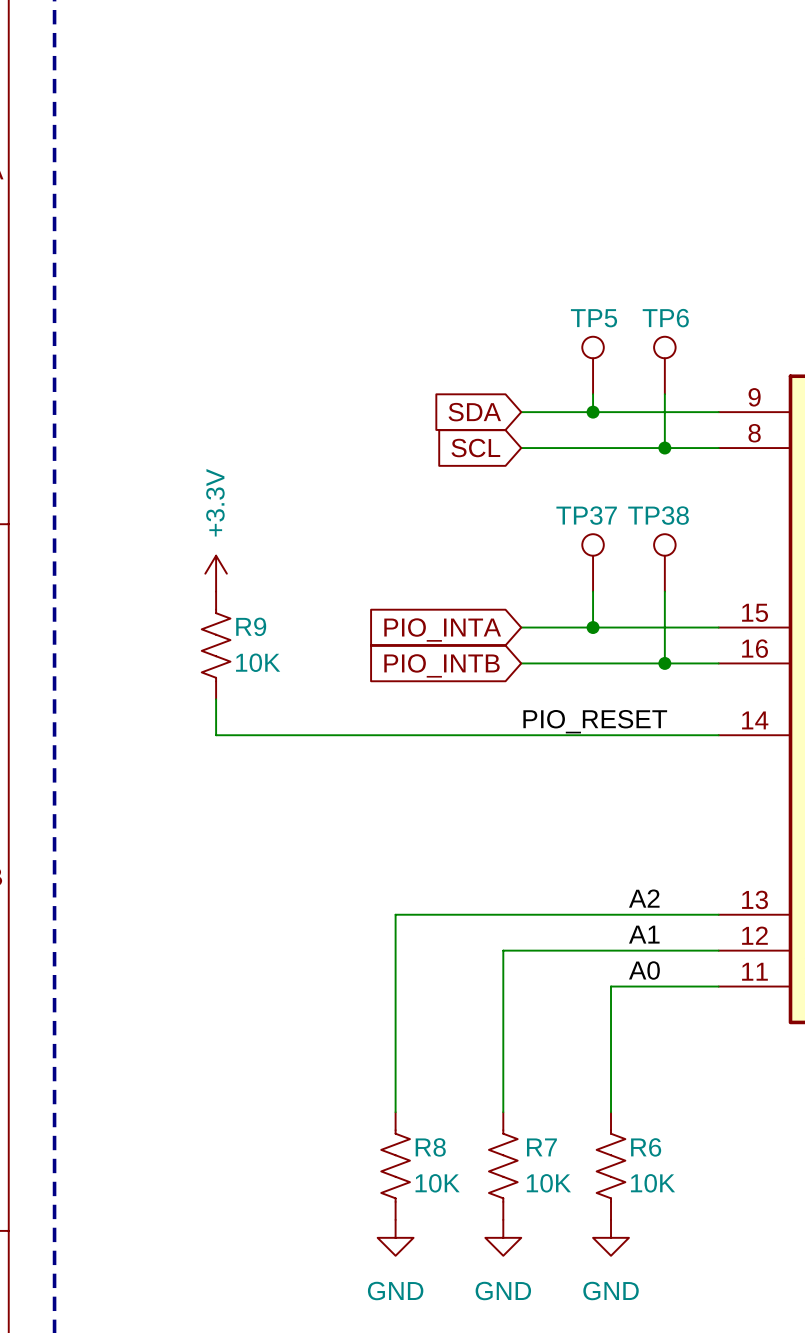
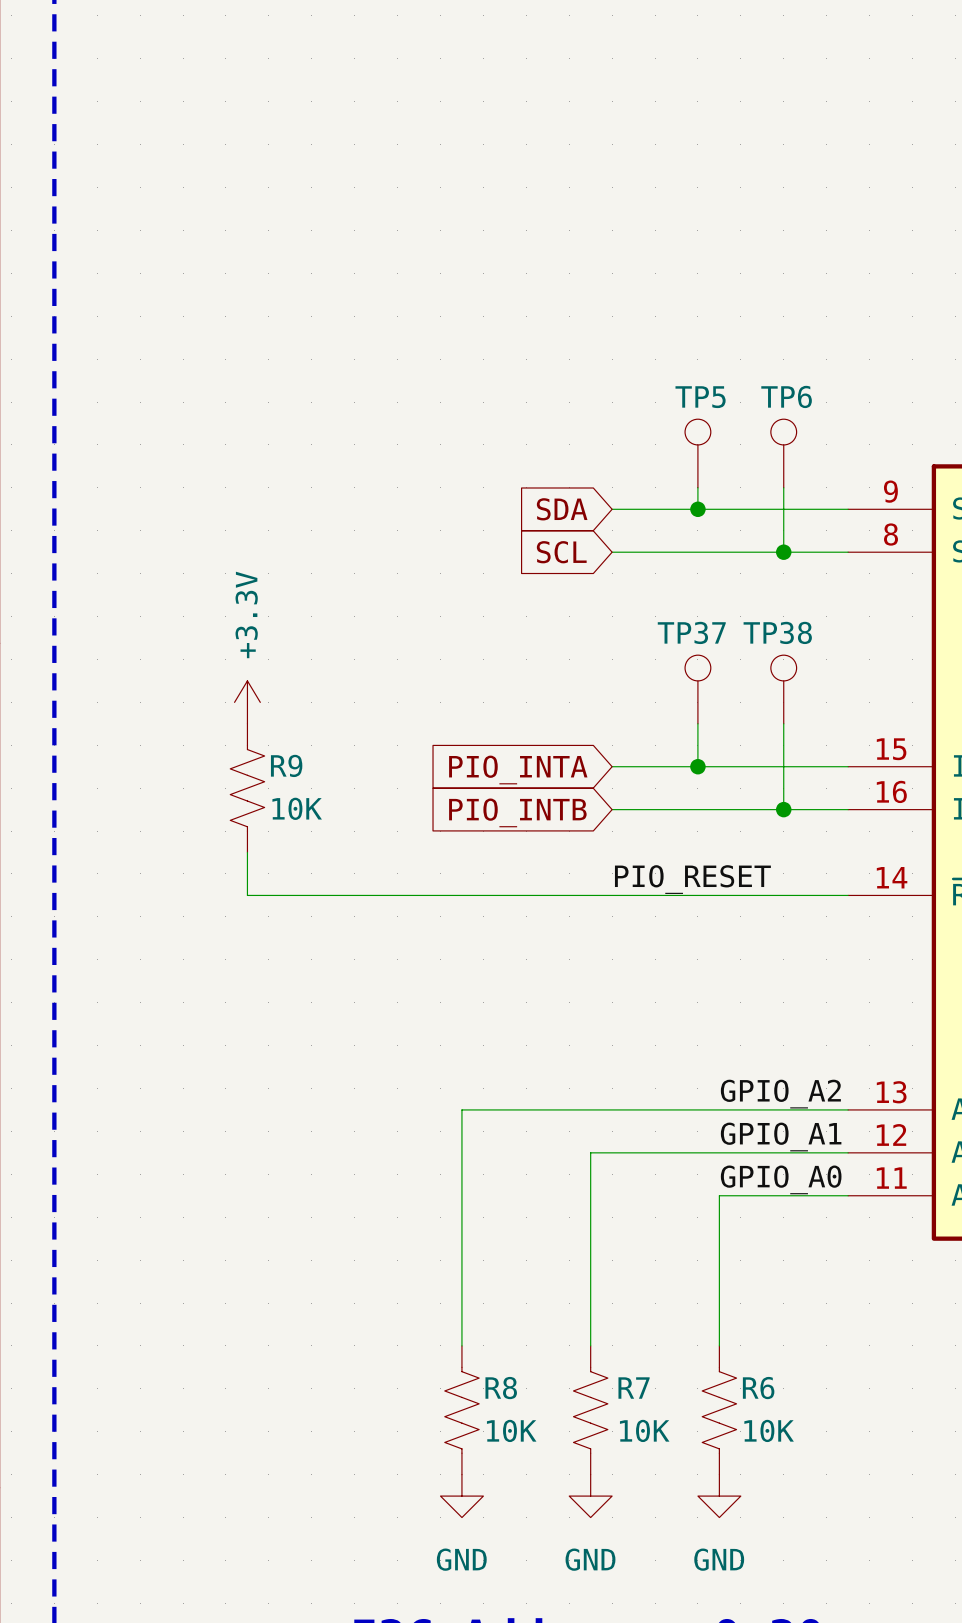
label: A2 (644, 898) -> none
label: none -> GPIO_A2 (780, 1094)
label: A1 (644, 934) -> none
label: none -> GPIO_A1 (781, 1136)
label: A0 (644, 970) -> none
label: none -> GPIO_A0 (781, 1179)

